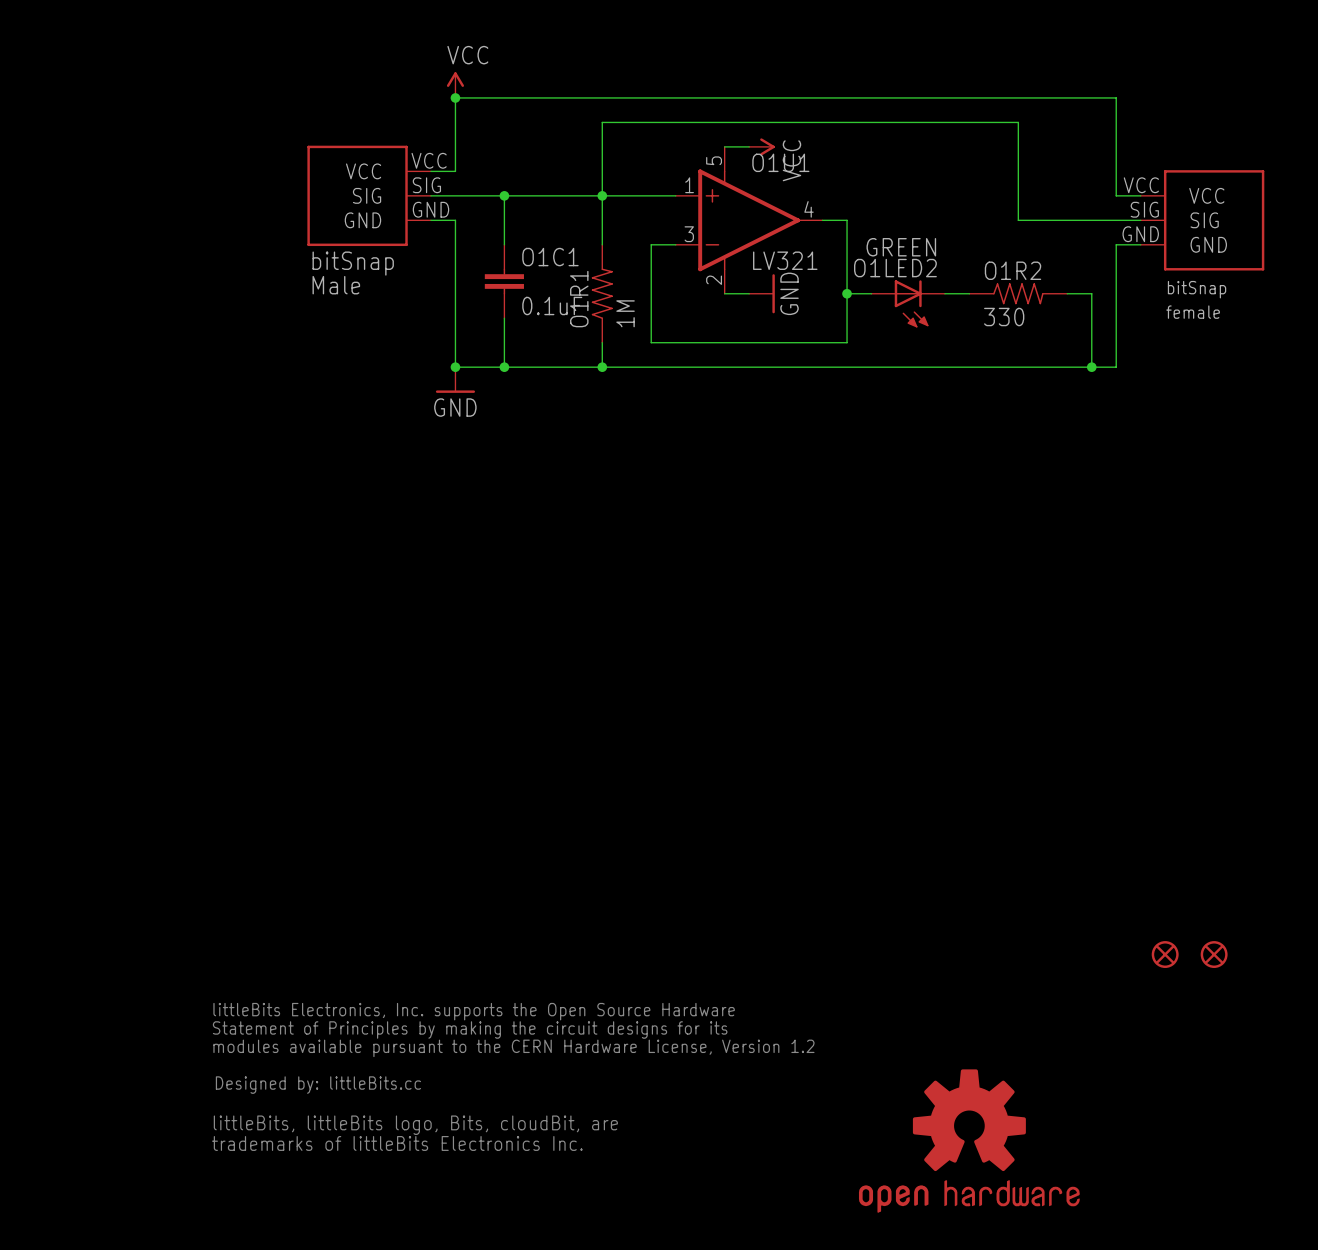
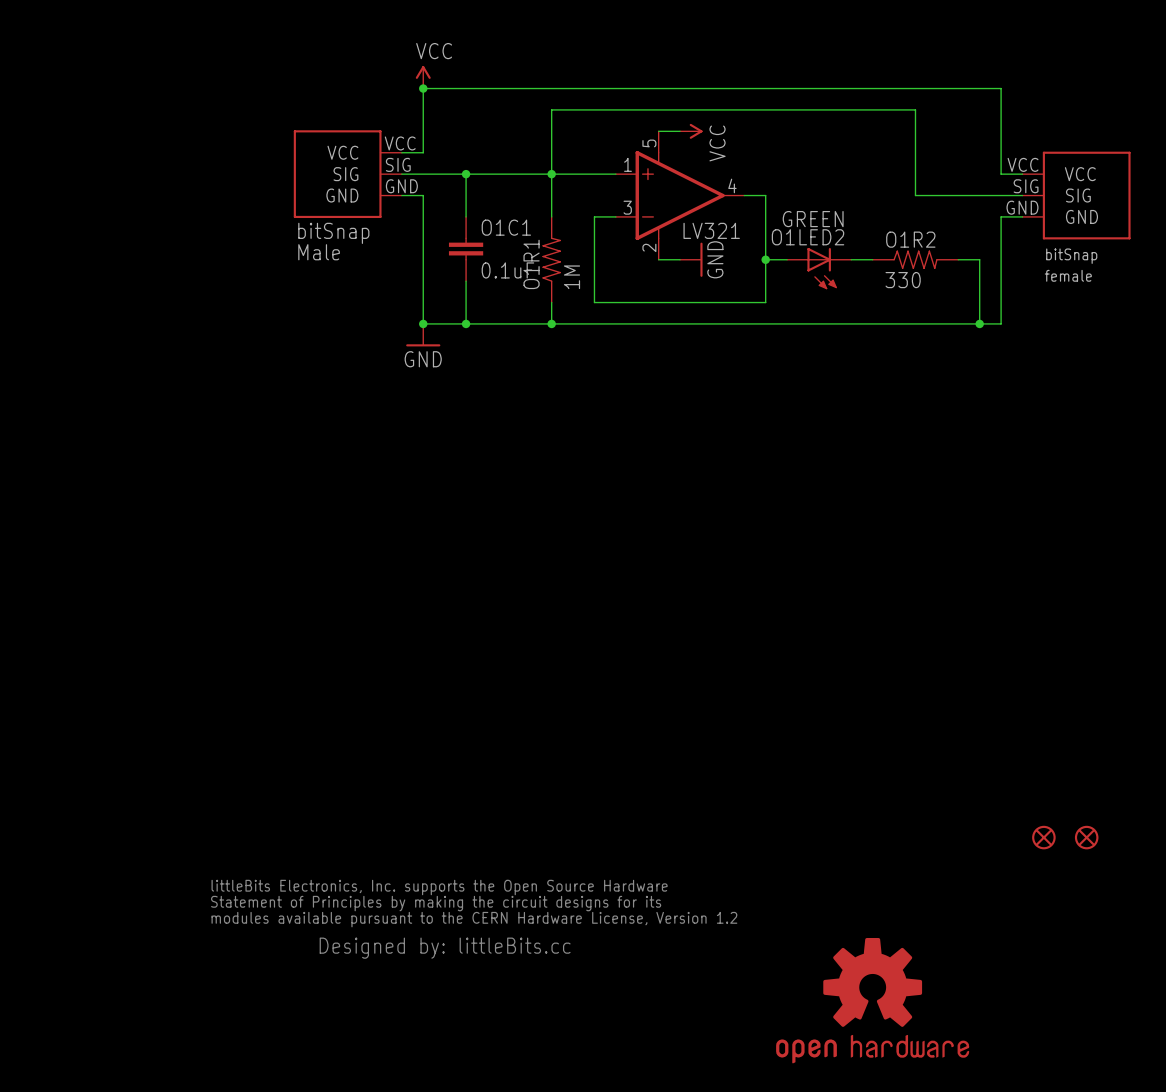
O1U1 name: O1U1 (780, 162) -> none
part: none -> (474, 919)
part: (513, 1076) -> none

